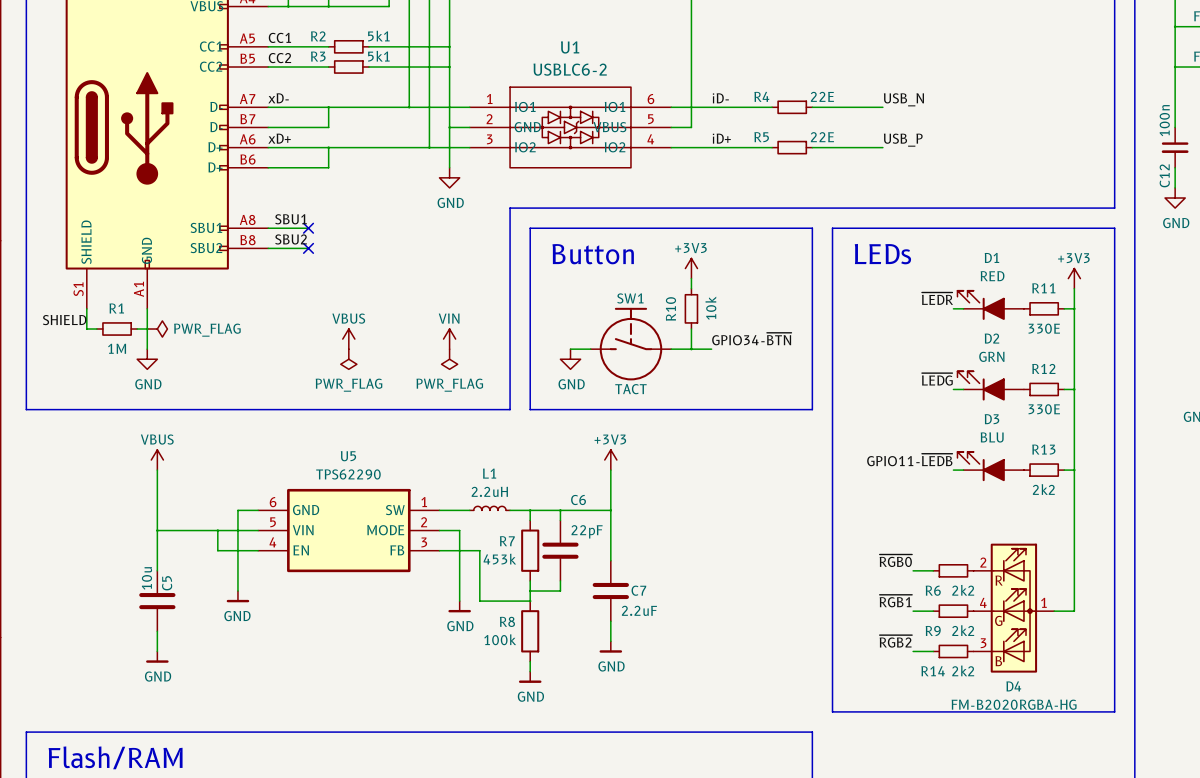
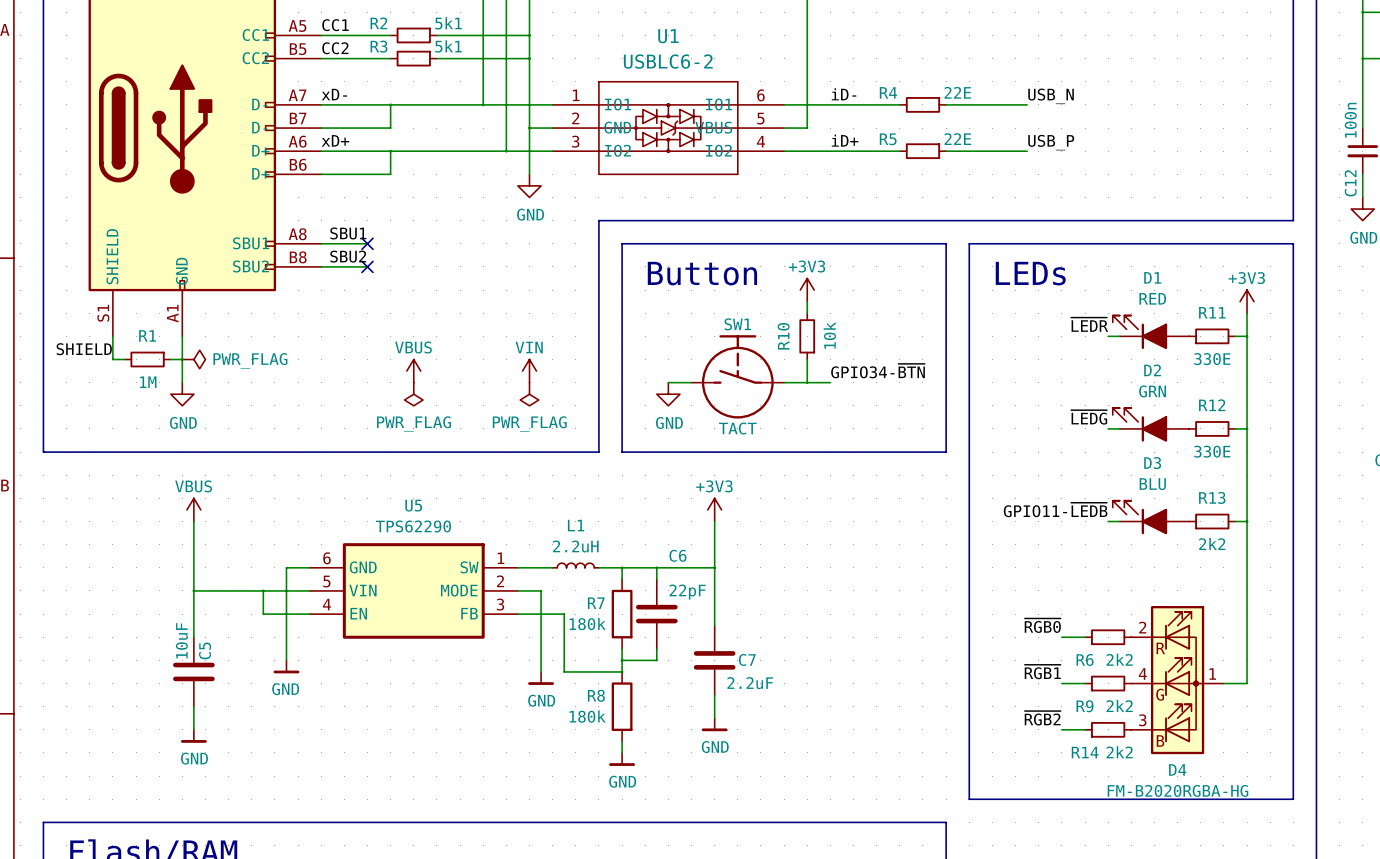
R7 value: 453k (499, 559) -> 180k (587, 624)
C5 value: 10u (146, 578) -> 10uF (181, 640)
R8 value: 100k (500, 639) -> 180k (587, 716)

